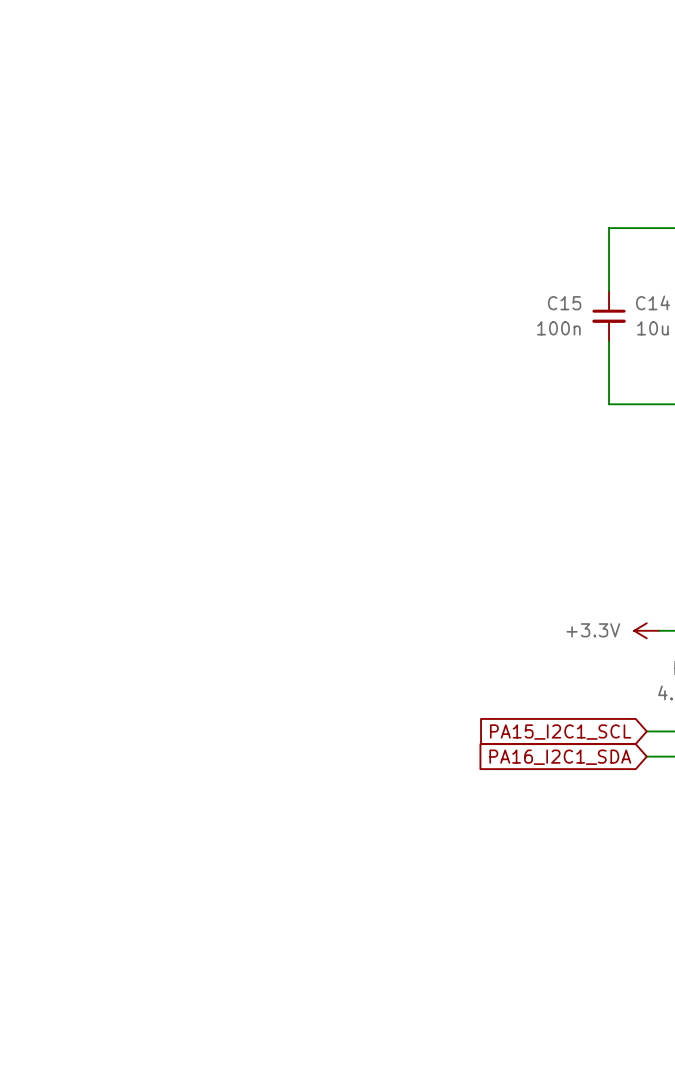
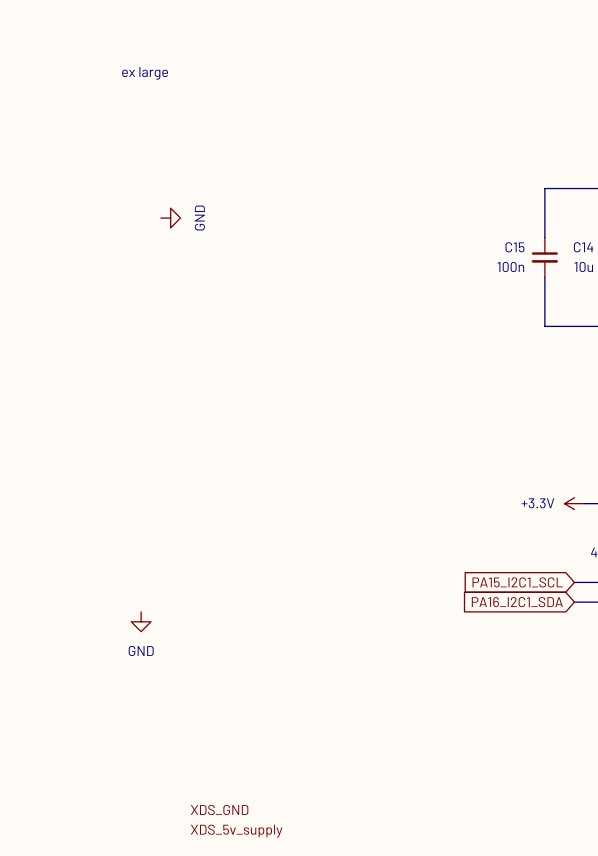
text: none -> ex large (145, 73)
power symbol: none -> GND (170, 218)
power symbol: none -> GND (141, 621)
label: none -> XDS_GND (219, 809)
label: none -> XDS_5v_supply (236, 831)

